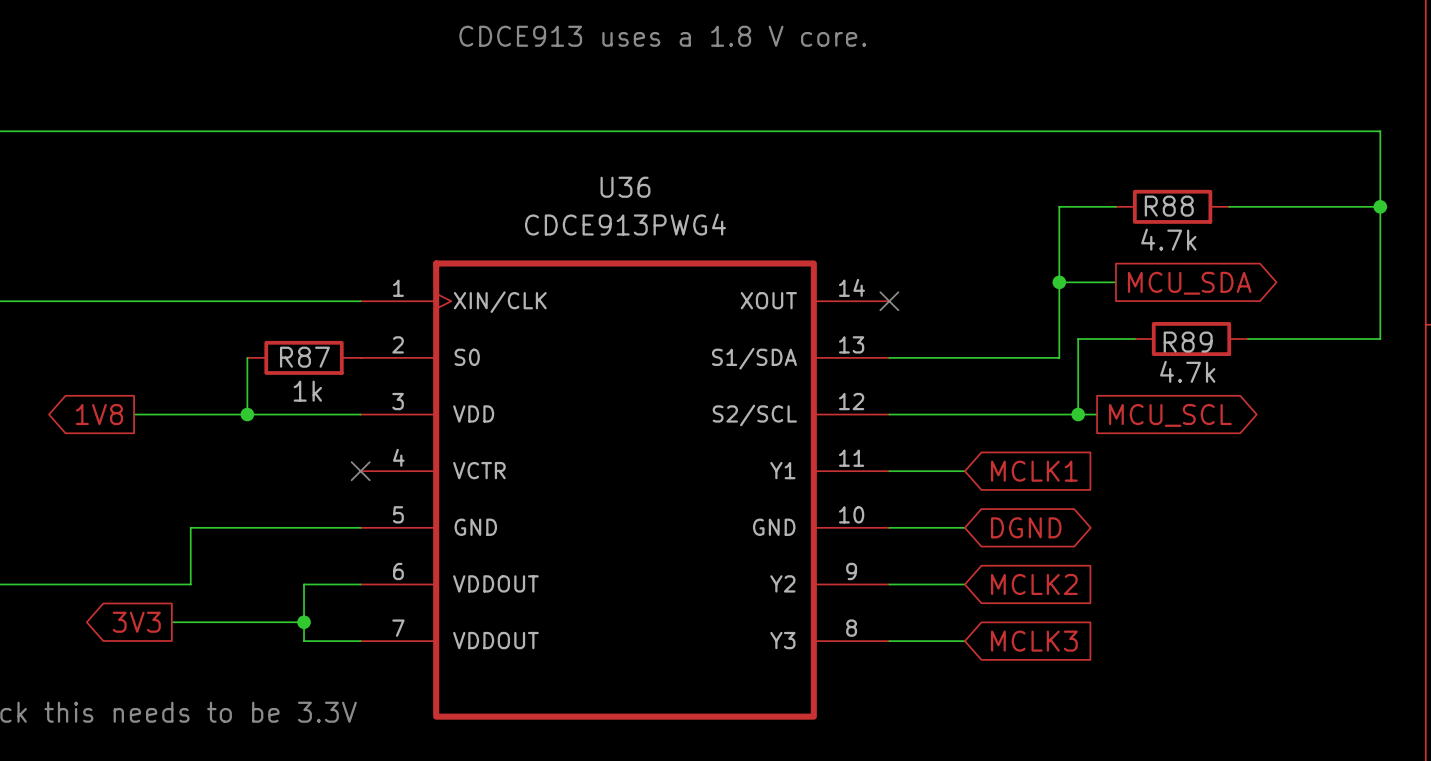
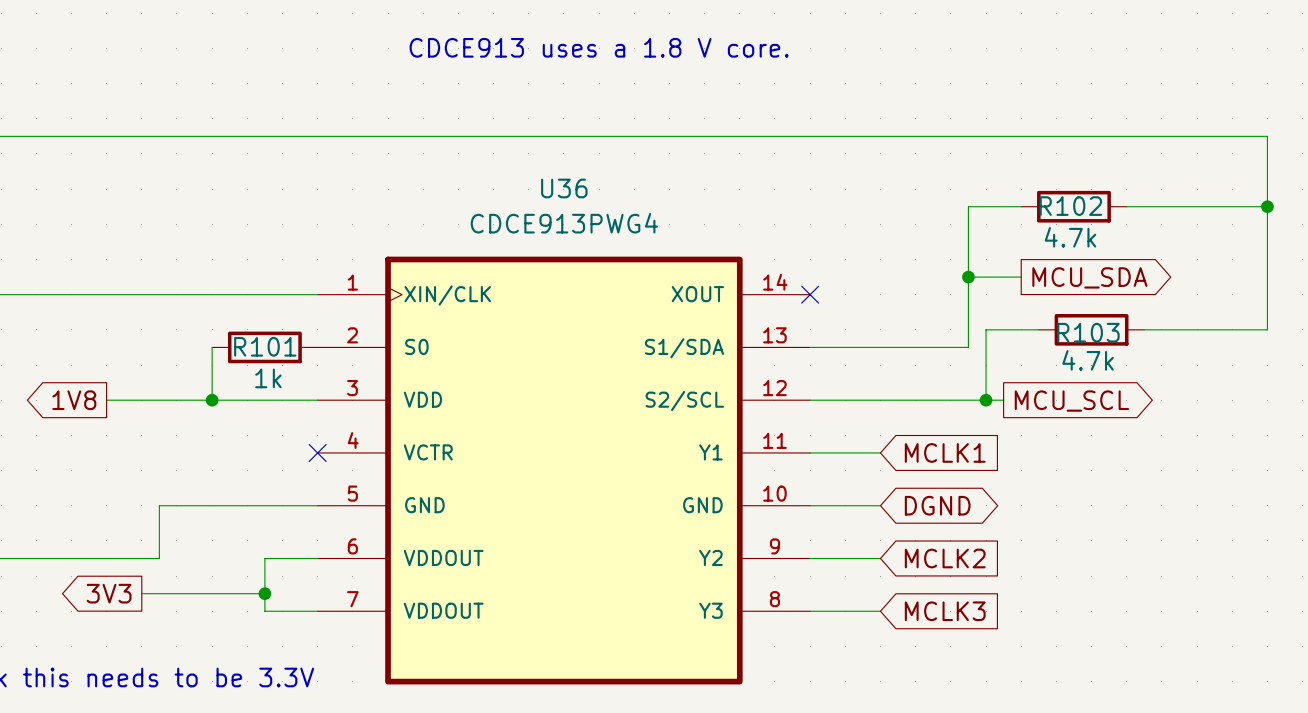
R88 name: R88 (1169, 206) -> R102 (1070, 206)
R89 name: R89 (1188, 342) -> R103 (1088, 332)
R87 name: R87 (304, 357) -> R101 (265, 346)

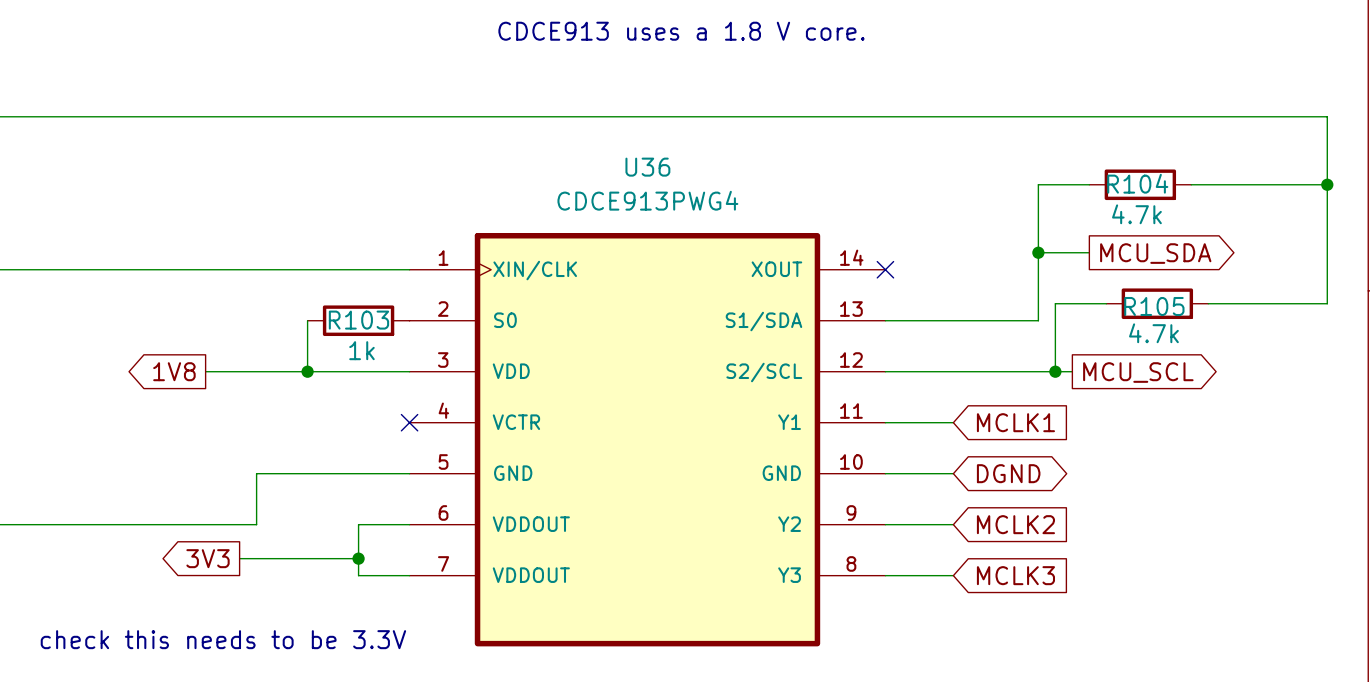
R102 name: R102 (1070, 206) -> R104 (1137, 183)
R103 name: R103 (1088, 332) -> R105 (1154, 306)
R101 name: R101 (265, 346) -> R103 (358, 320)

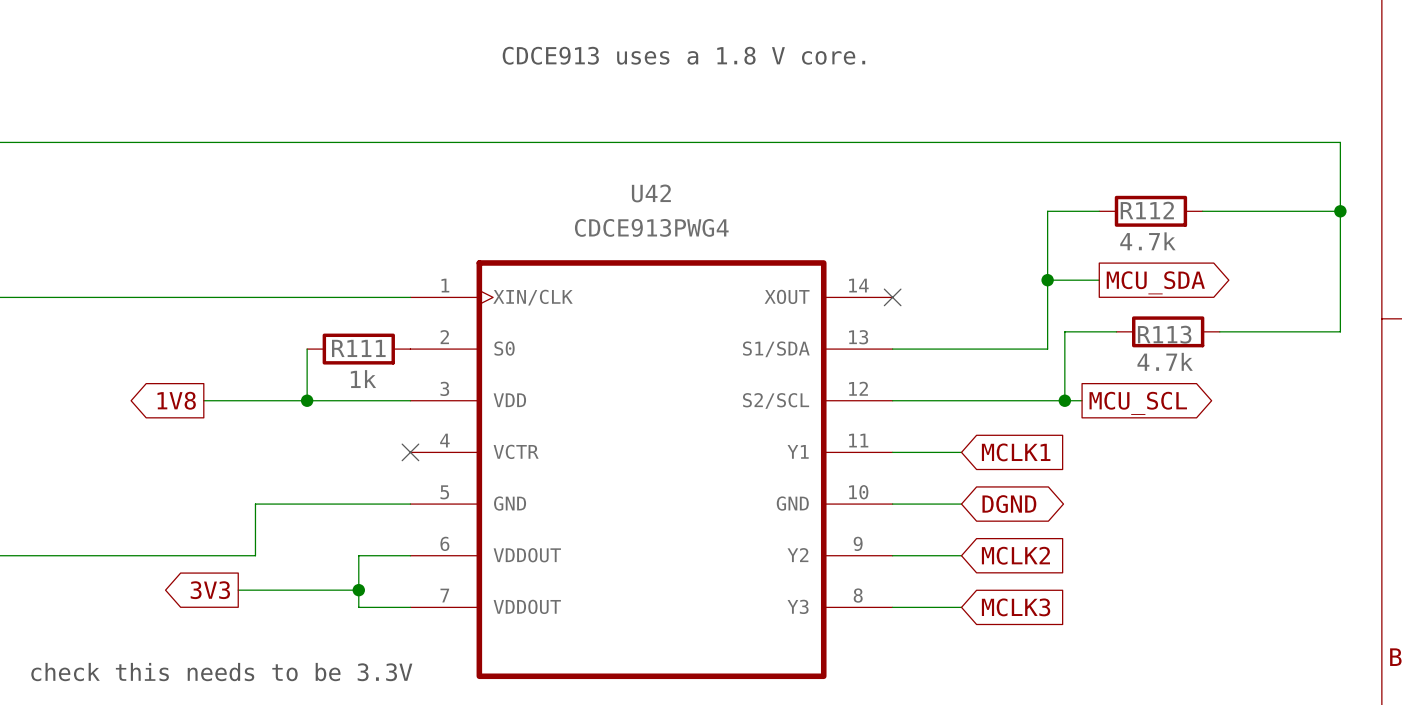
U36 name: U36 (647, 167) -> U42 (651, 193)
R104 name: R104 (1137, 183) -> R112 (1147, 210)
R105 name: R105 (1154, 306) -> R113 (1164, 334)
R103 name: R103 (358, 320) -> R111 (358, 348)

